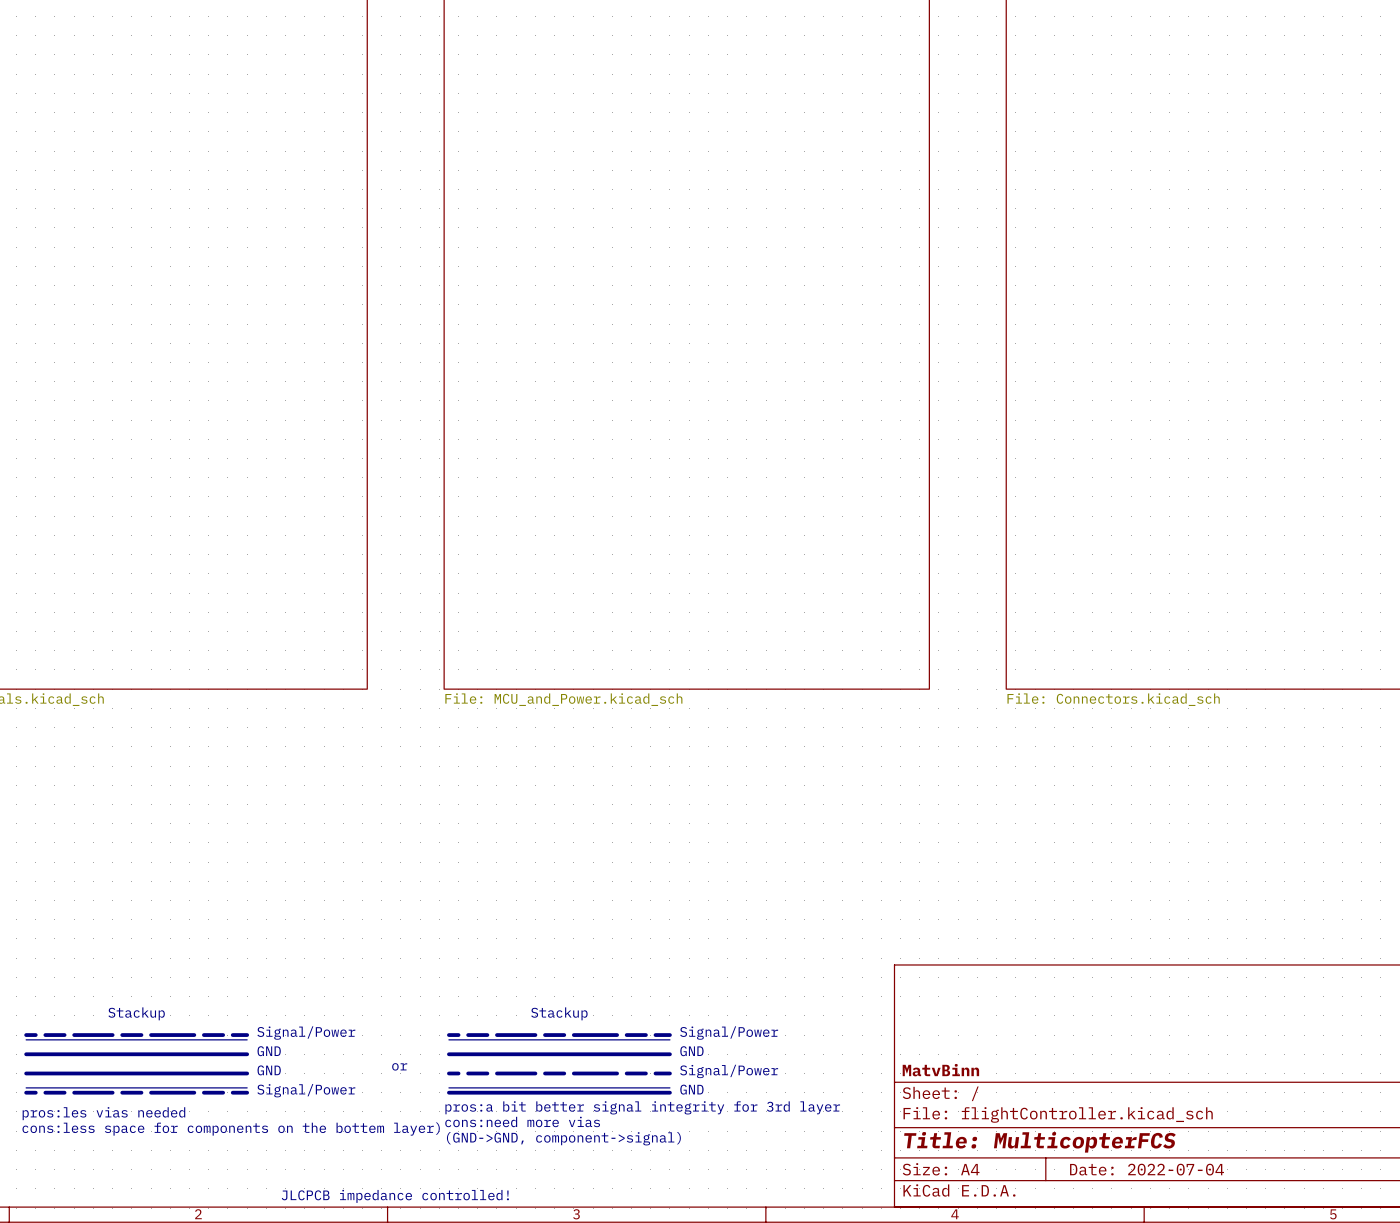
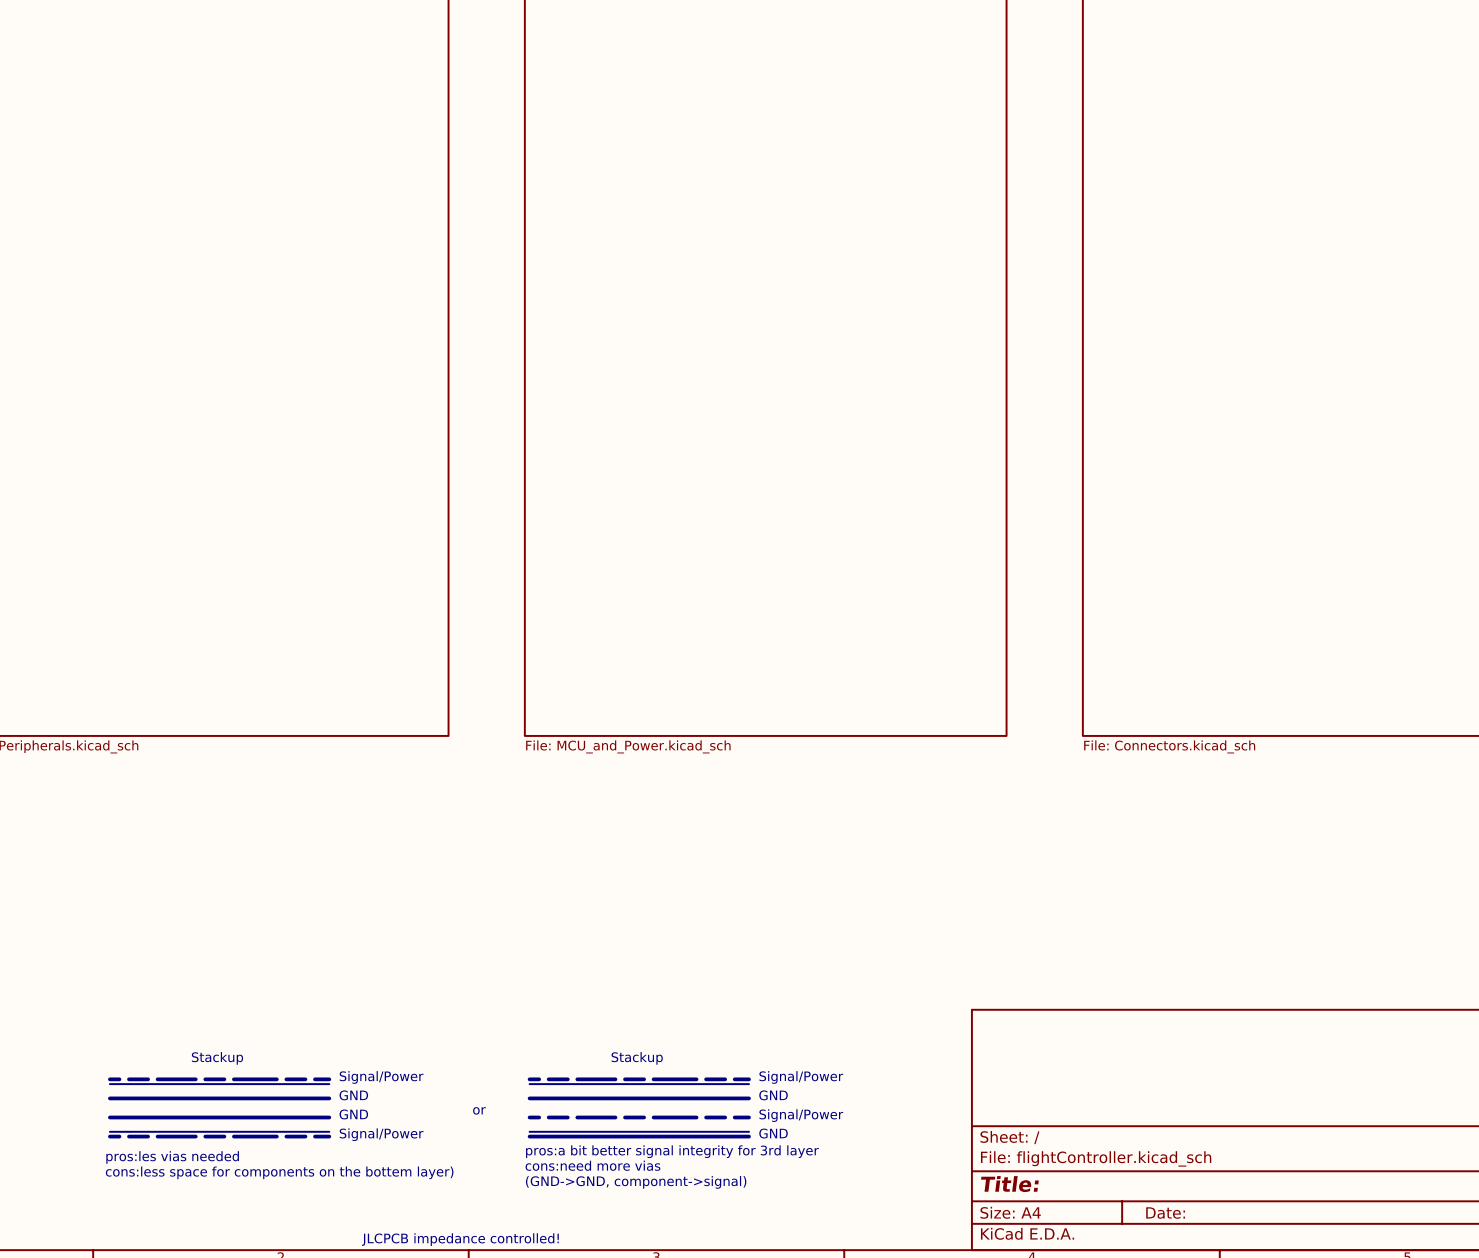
title block: MatvBinn (940, 1070) -> none
title block: Title: MulticopterFCS (1039, 1142) -> Title: (1009, 1184)
title block: Date: 2022-07-04 (1147, 1169) -> Date: (1165, 1213)

